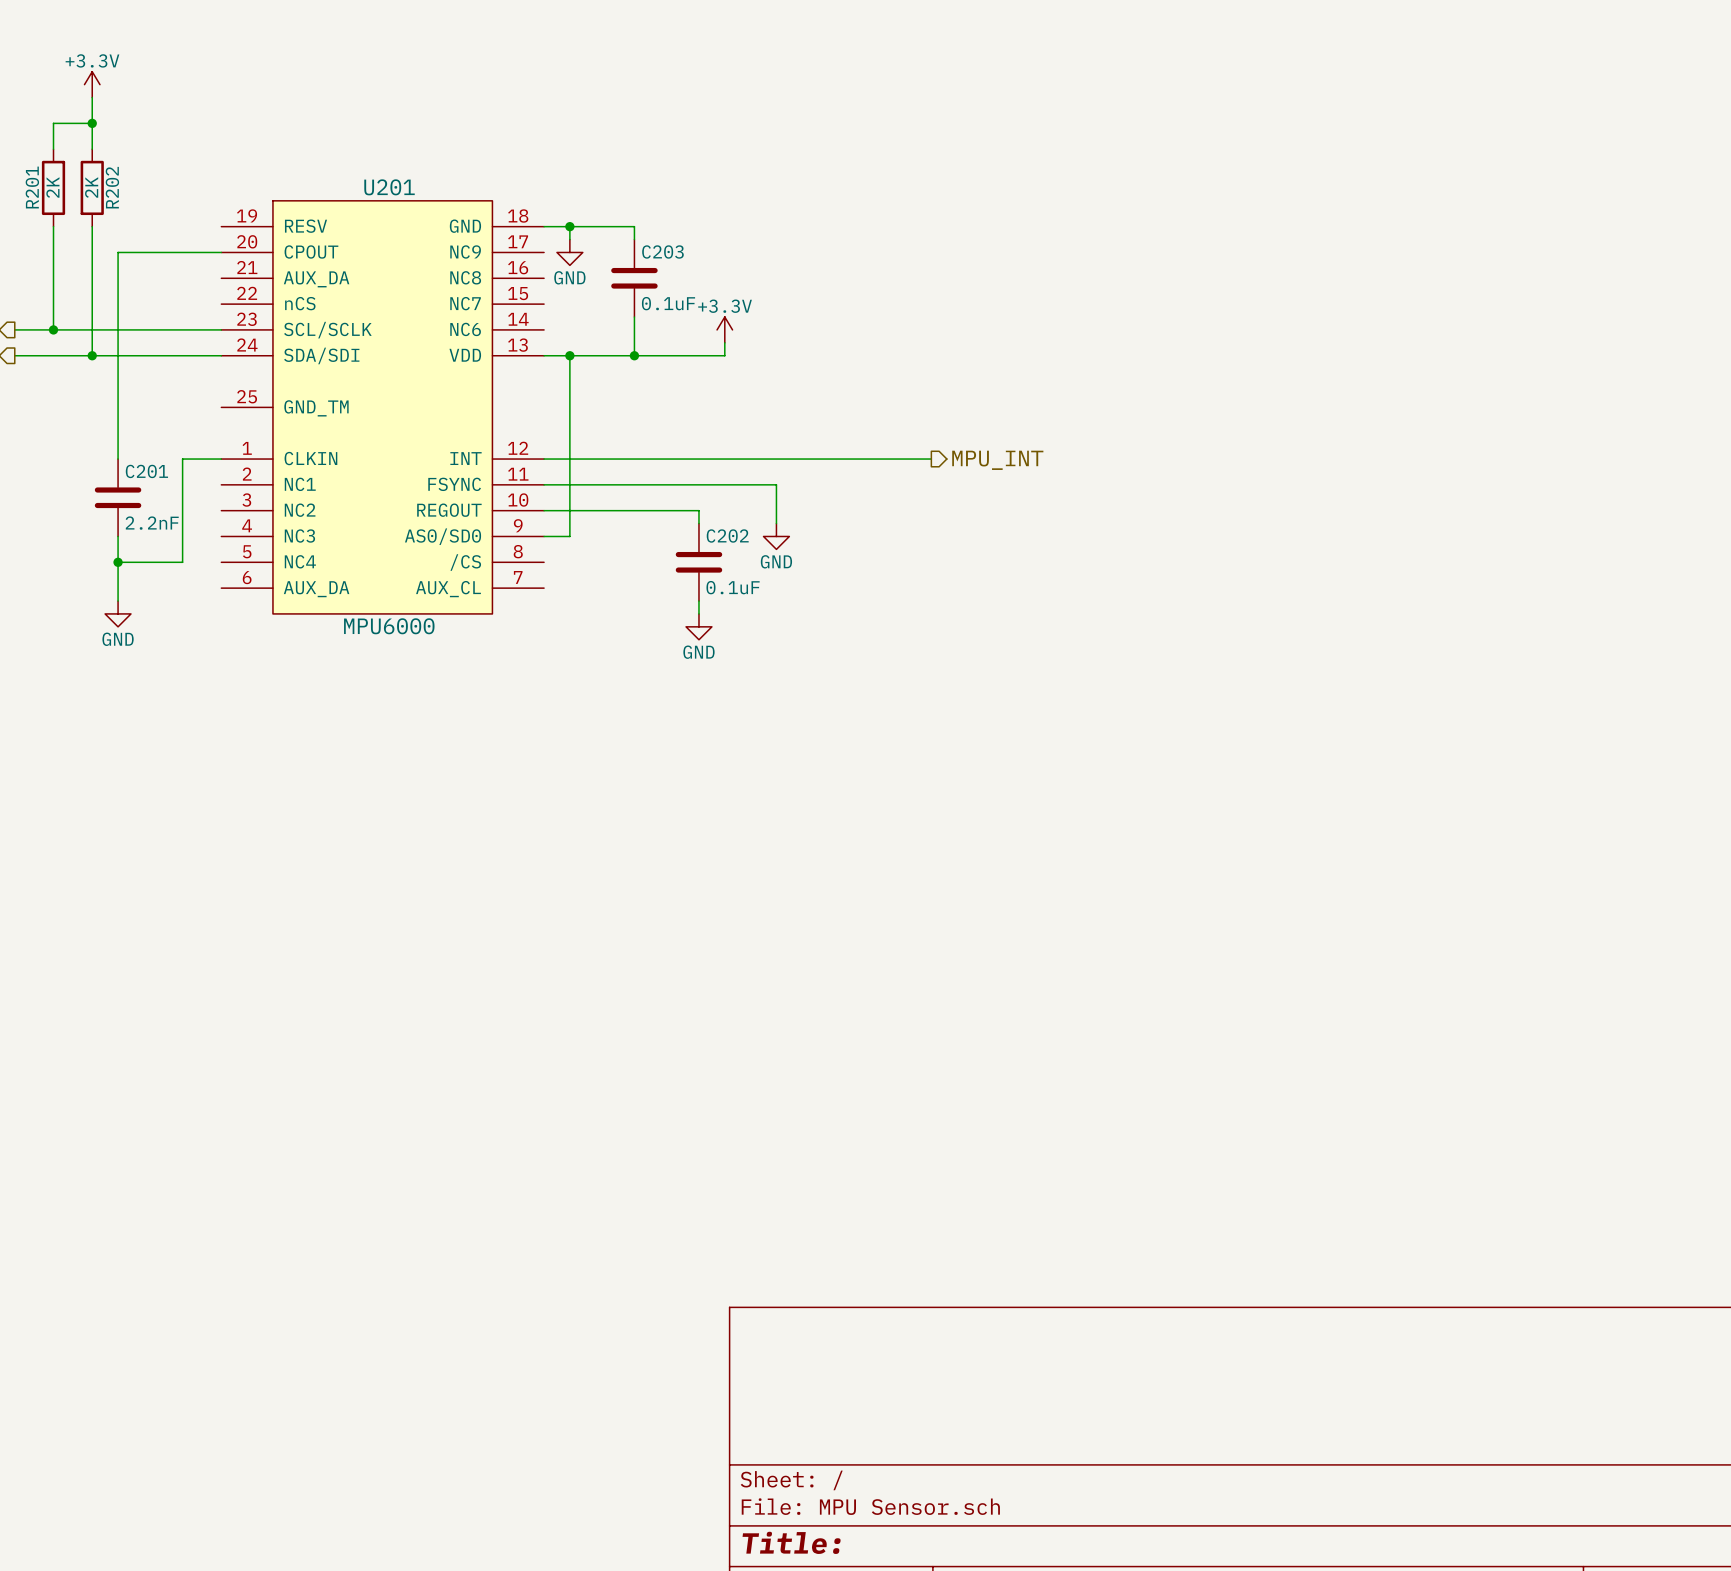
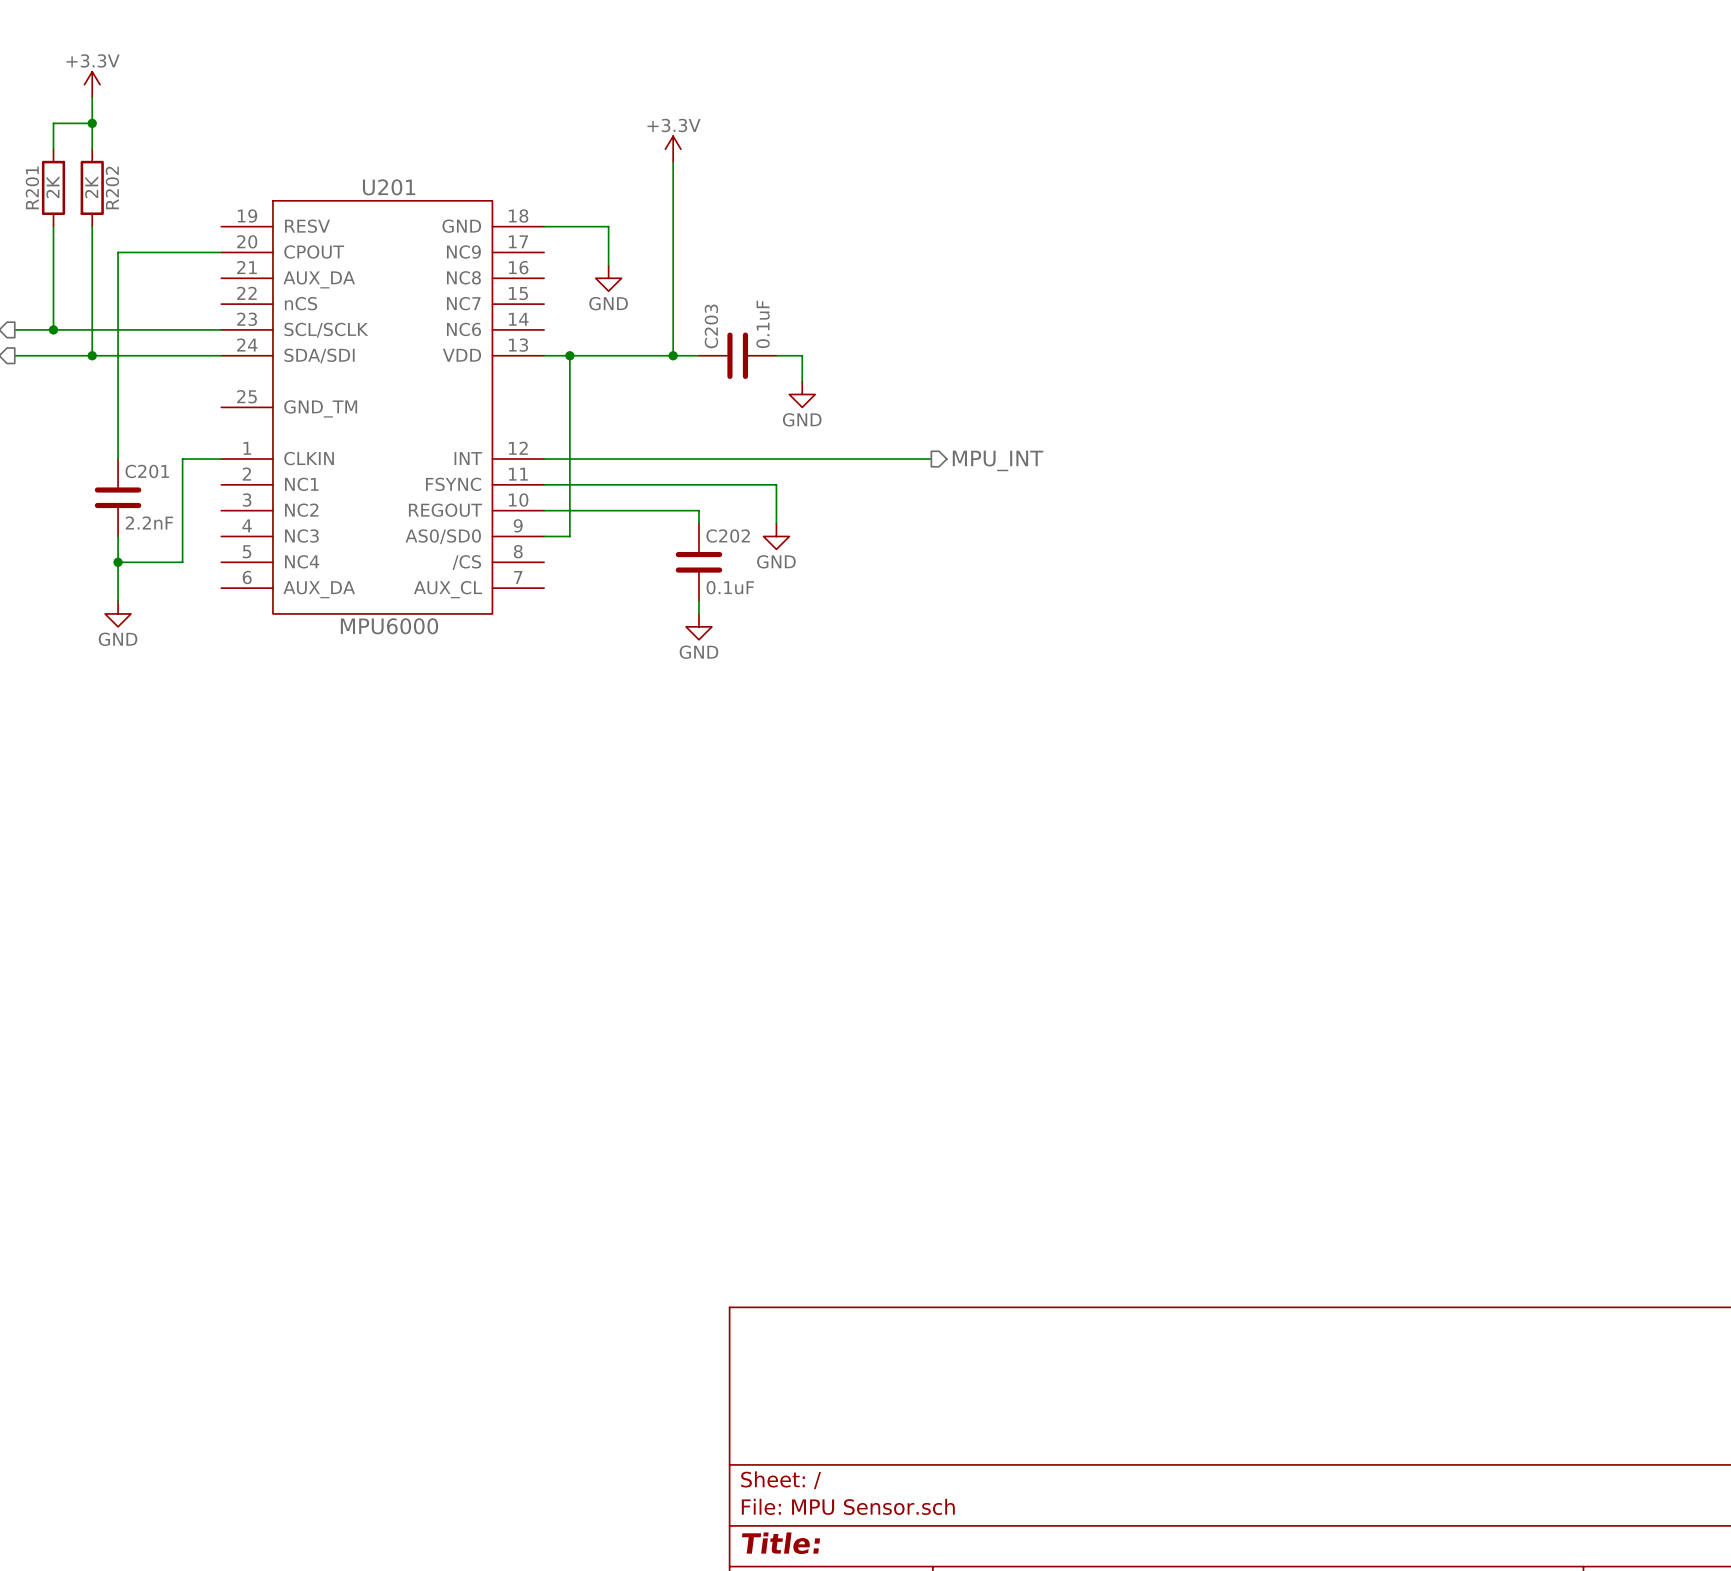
wire: none -> (673, 162) (673, 355)
wire: (569, 226) (569, 239) -> none
junction: (569, 226) -> none
wire: (608, 226) (634, 226) (634, 239) -> (608, 226) (608, 265)
C203 name position: C203 (662, 251) -> C203 (711, 326)
power symbol position: GND (569, 252) -> GND (608, 278)
C203 rotation: 0° (634, 278) -> 90° clockwise (737, 355)
C203 position: (634, 278) -> (737, 355)
C203 value position: 0.1uF (668, 303) -> 0.1uF (763, 324)
wire: (634, 317) (634, 355) -> none
power symbol position: +3.3V (724, 329) -> +3.3V (673, 149)
junction position: (634, 355) -> (673, 355)
wire: none -> (776, 355) (802, 355) (802, 381)
power symbol: none -> GND (802, 394)

